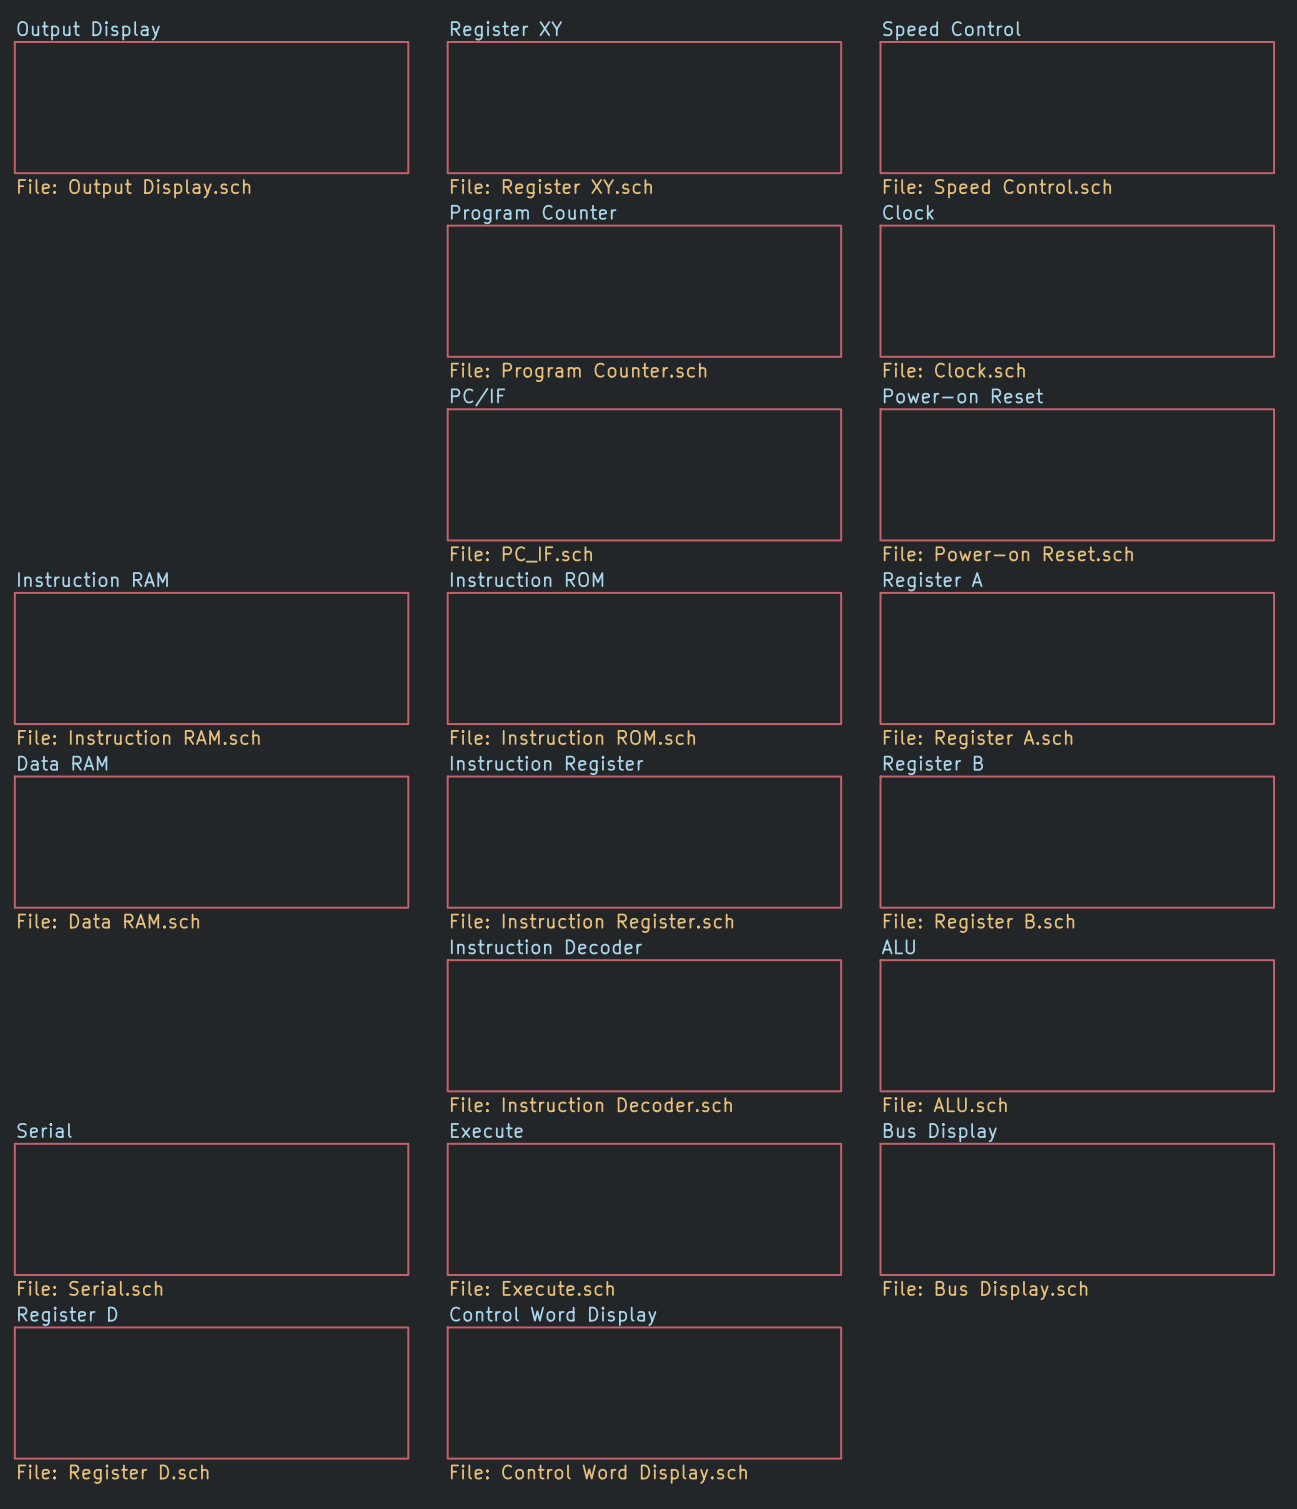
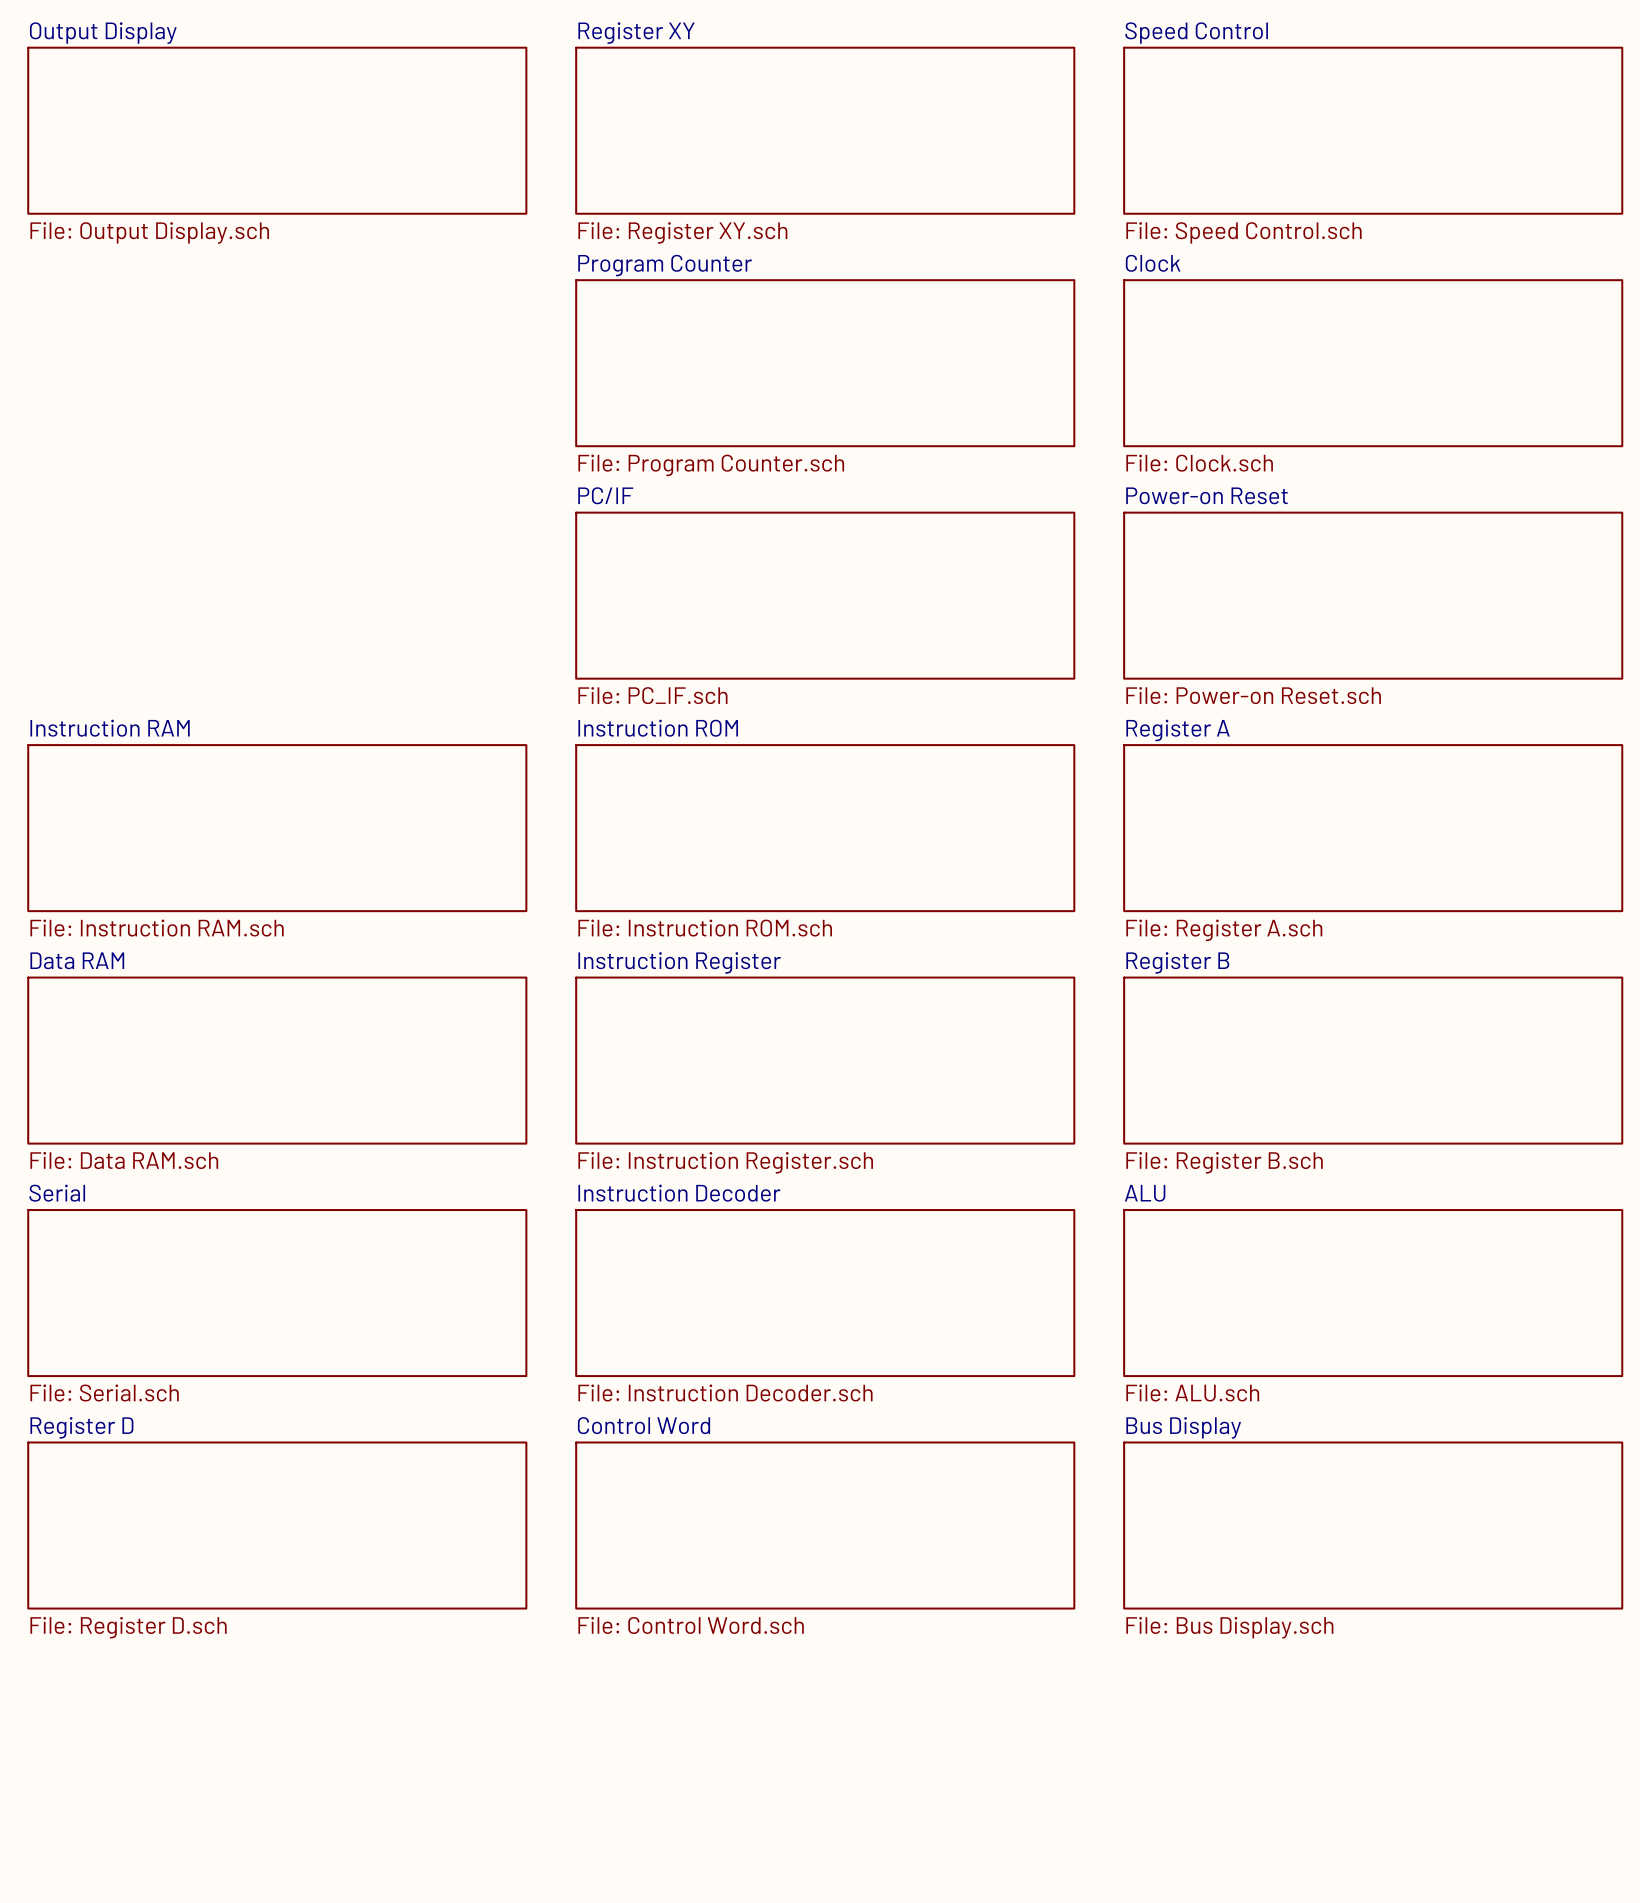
sheet Serial: none -> File: Serial.sch (277, 1293)
sheet Serial name: Serial (44, 1130) -> Register D (81, 1427)
sheet Execute name: Execute (486, 1130) -> Control Word (644, 1425)
sheet Serial value: File: Serial.sch (90, 1288) -> File: Register D.sch (128, 1627)
sheet Execute value: File: Execute.sch (532, 1288) -> File: Control Word.sch (691, 1625)
sheet Register D: File: Register D.sch (211, 1393) -> none
sheet Control Word Display: File: Control Word Display.sch (644, 1393) -> none

